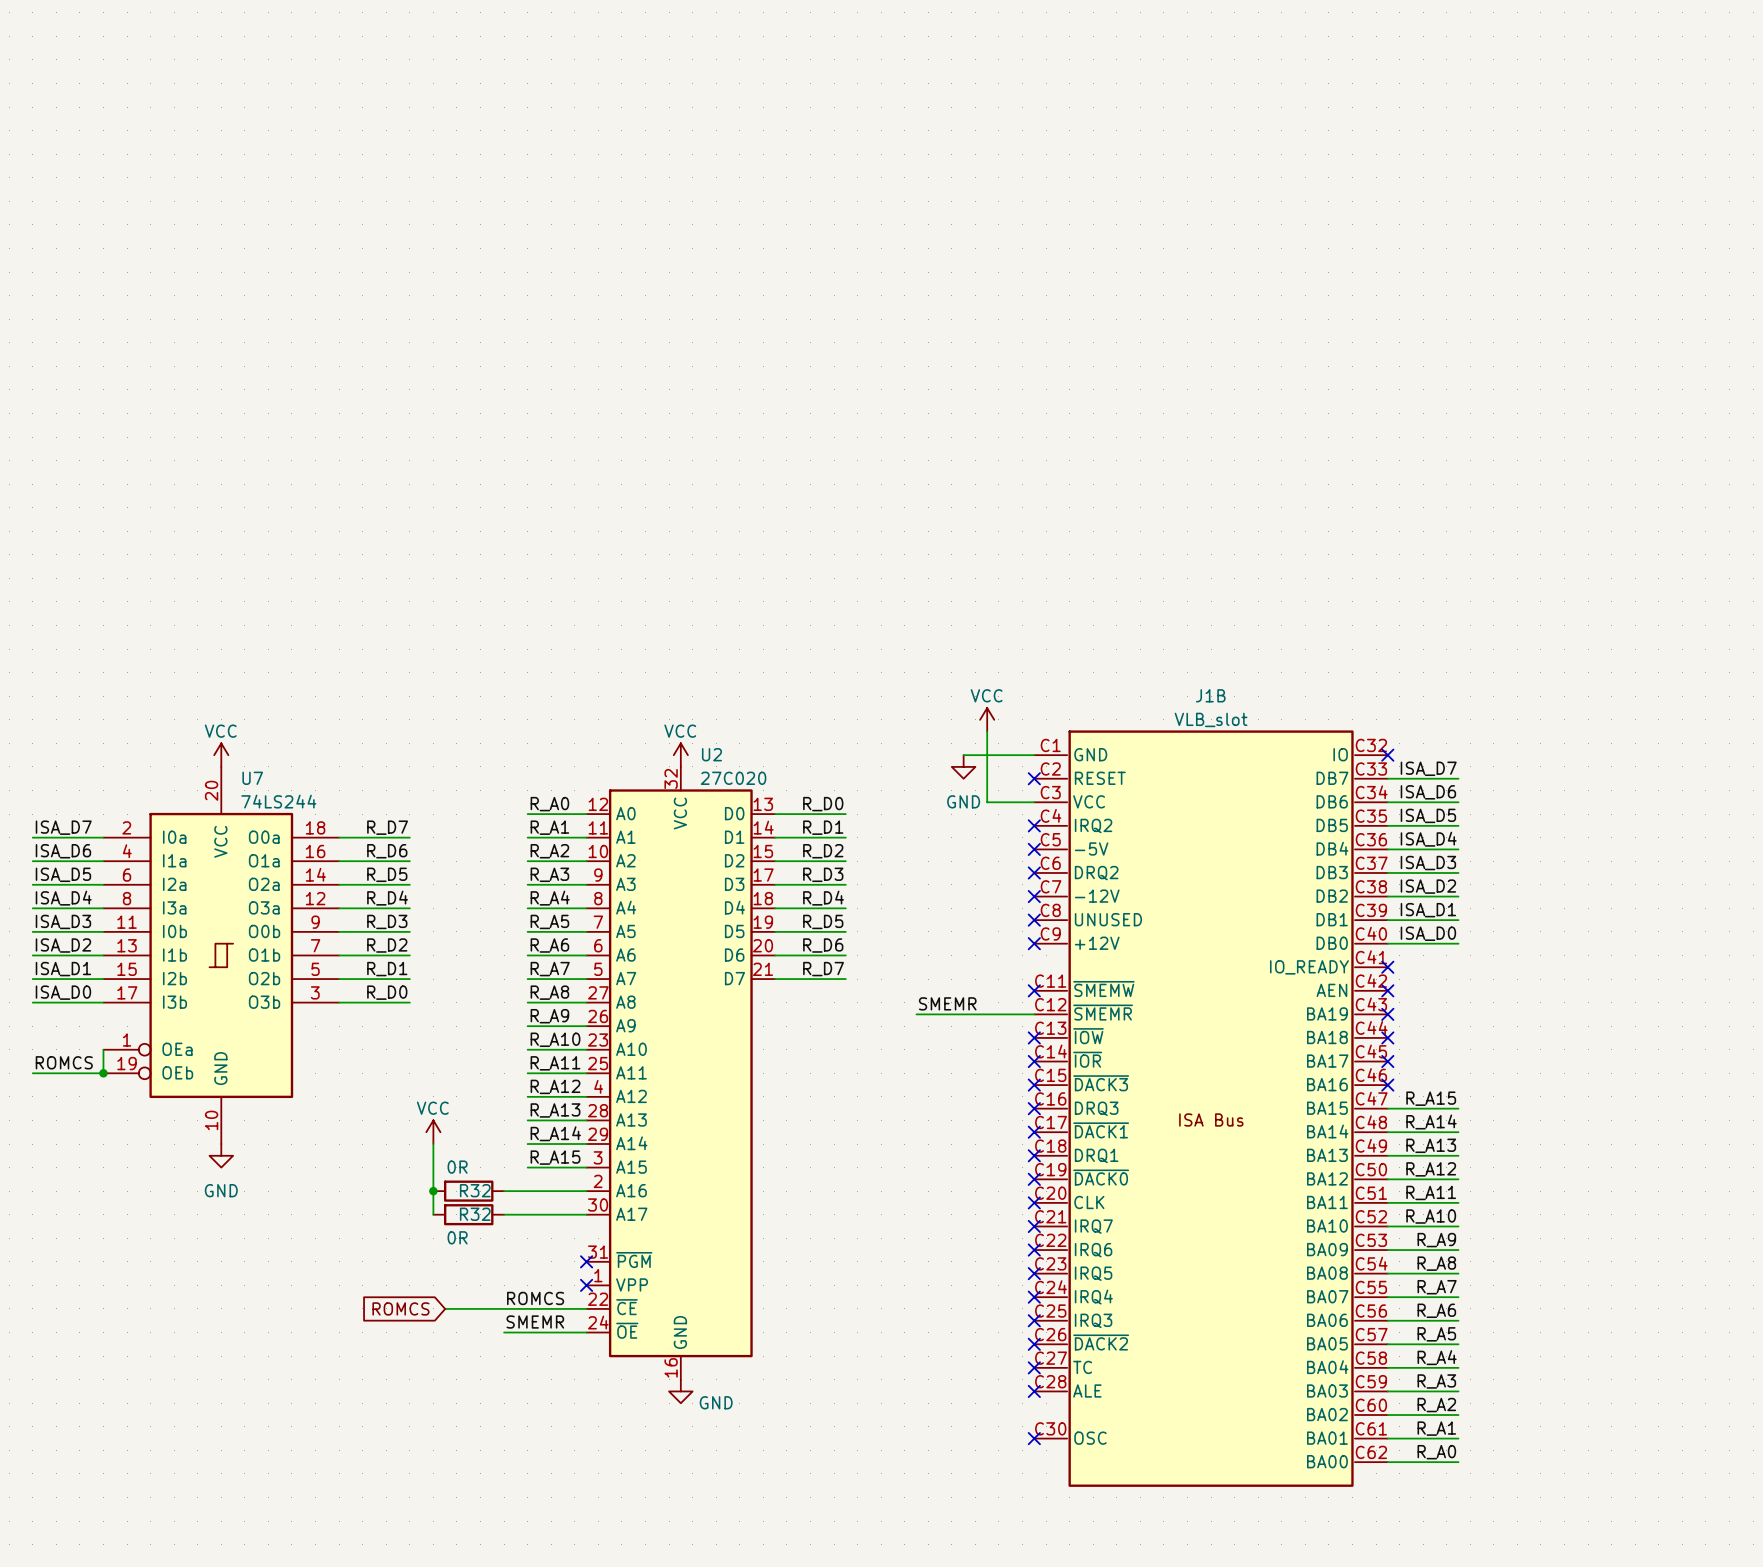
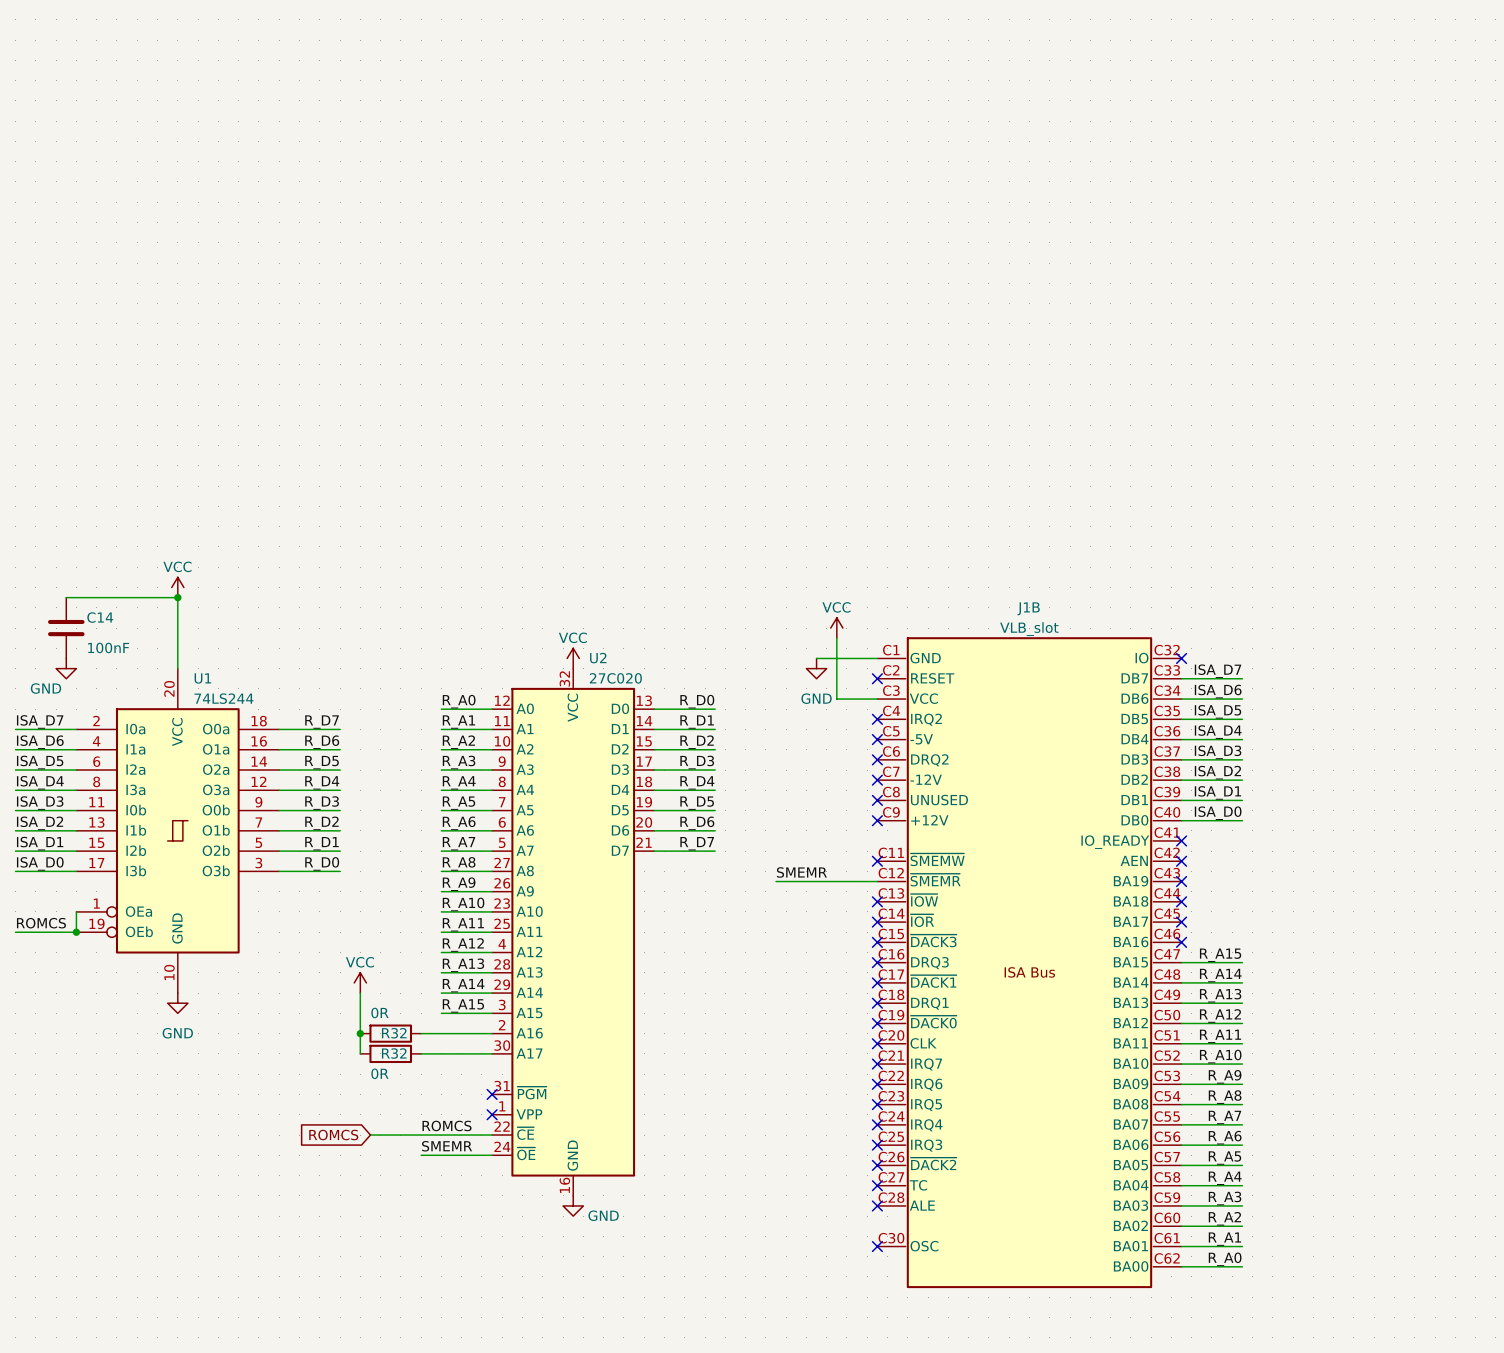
wire: none -> (66, 597) (177, 597) (177, 668)
junction: none -> (177, 597)
C14: none -> 100nF (66, 628)
power symbol position: VCC (221, 755) -> VCC (177, 587)
power symbol: none -> GND (66, 668)
U7 name: U7 (252, 778) -> U1 (202, 678)

